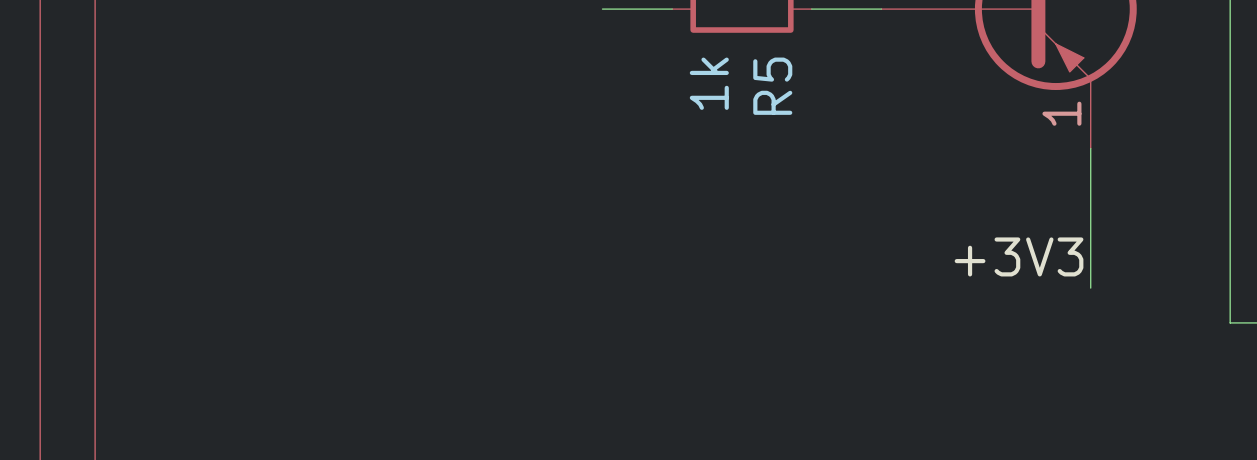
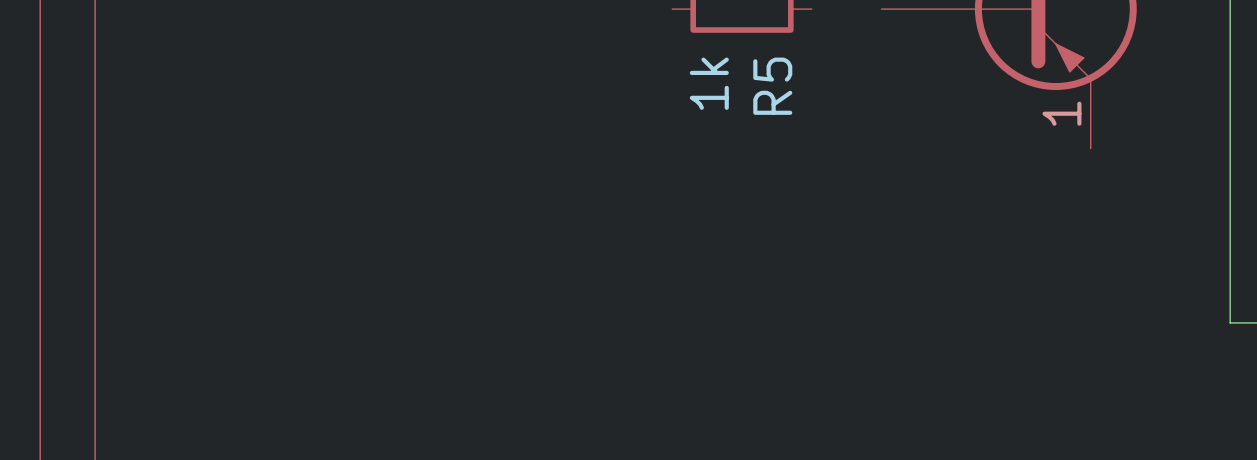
wire: (602, 9) (672, 9) -> none
wire: (811, 9) (881, 9) -> none
wire: (1090, 148) (1090, 288) -> none
label: +3V3 (1019, 256) -> none

